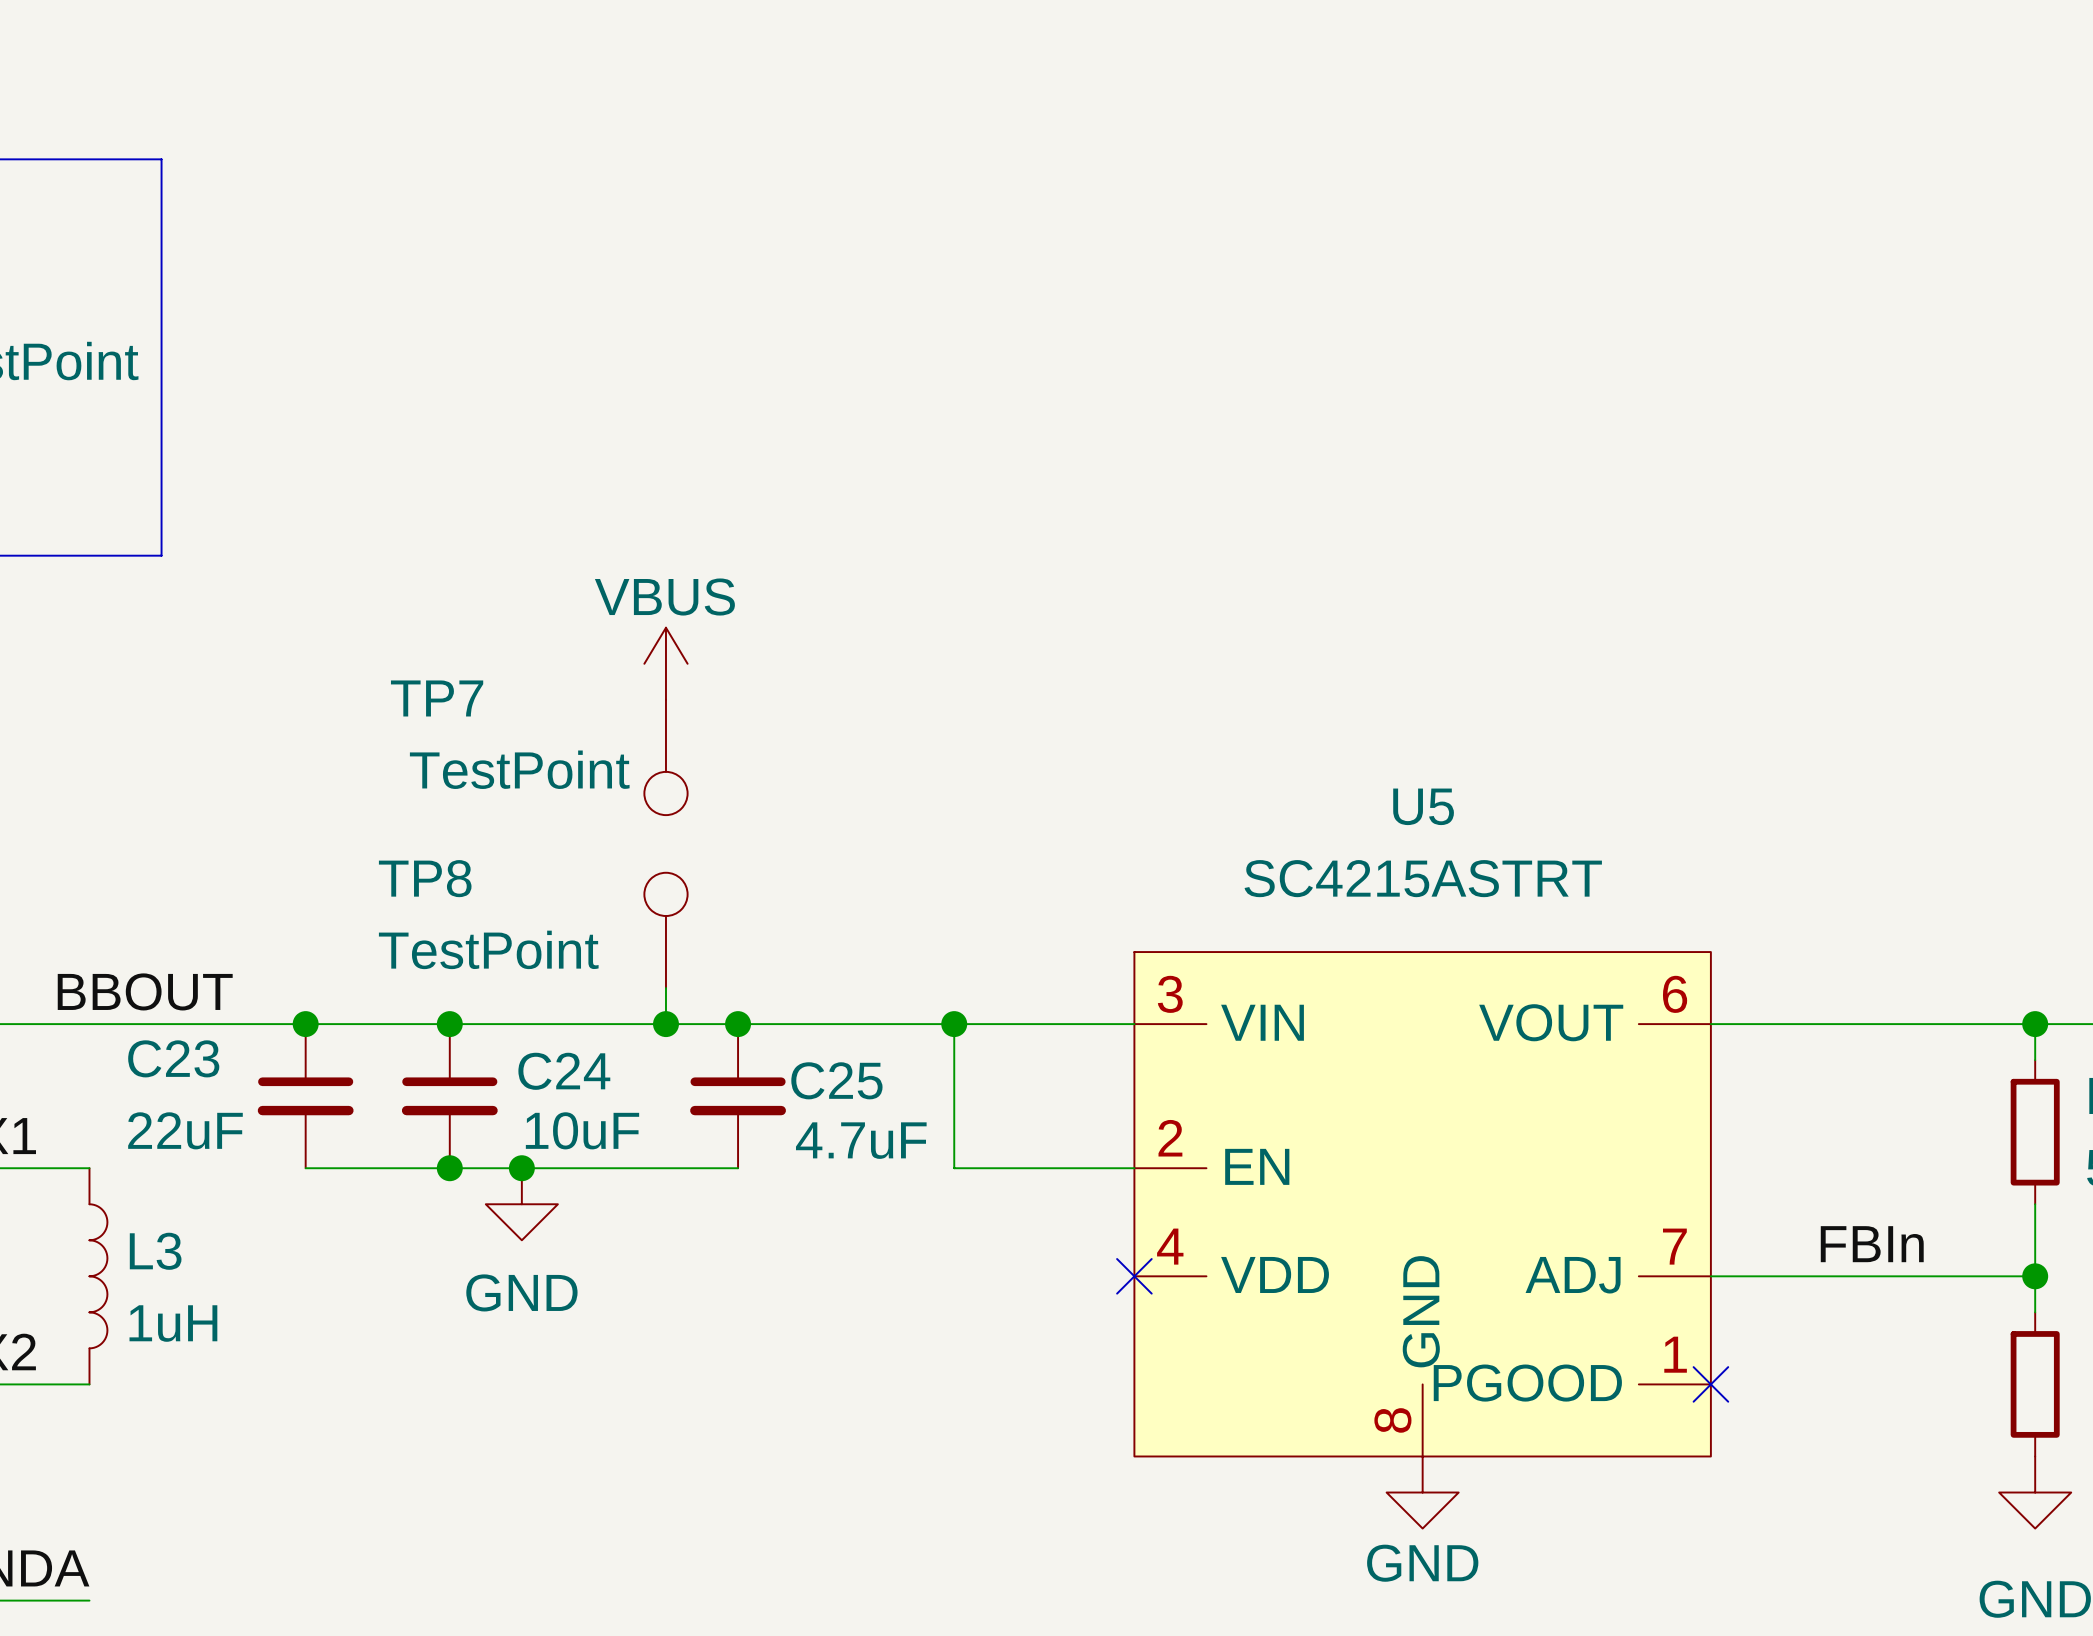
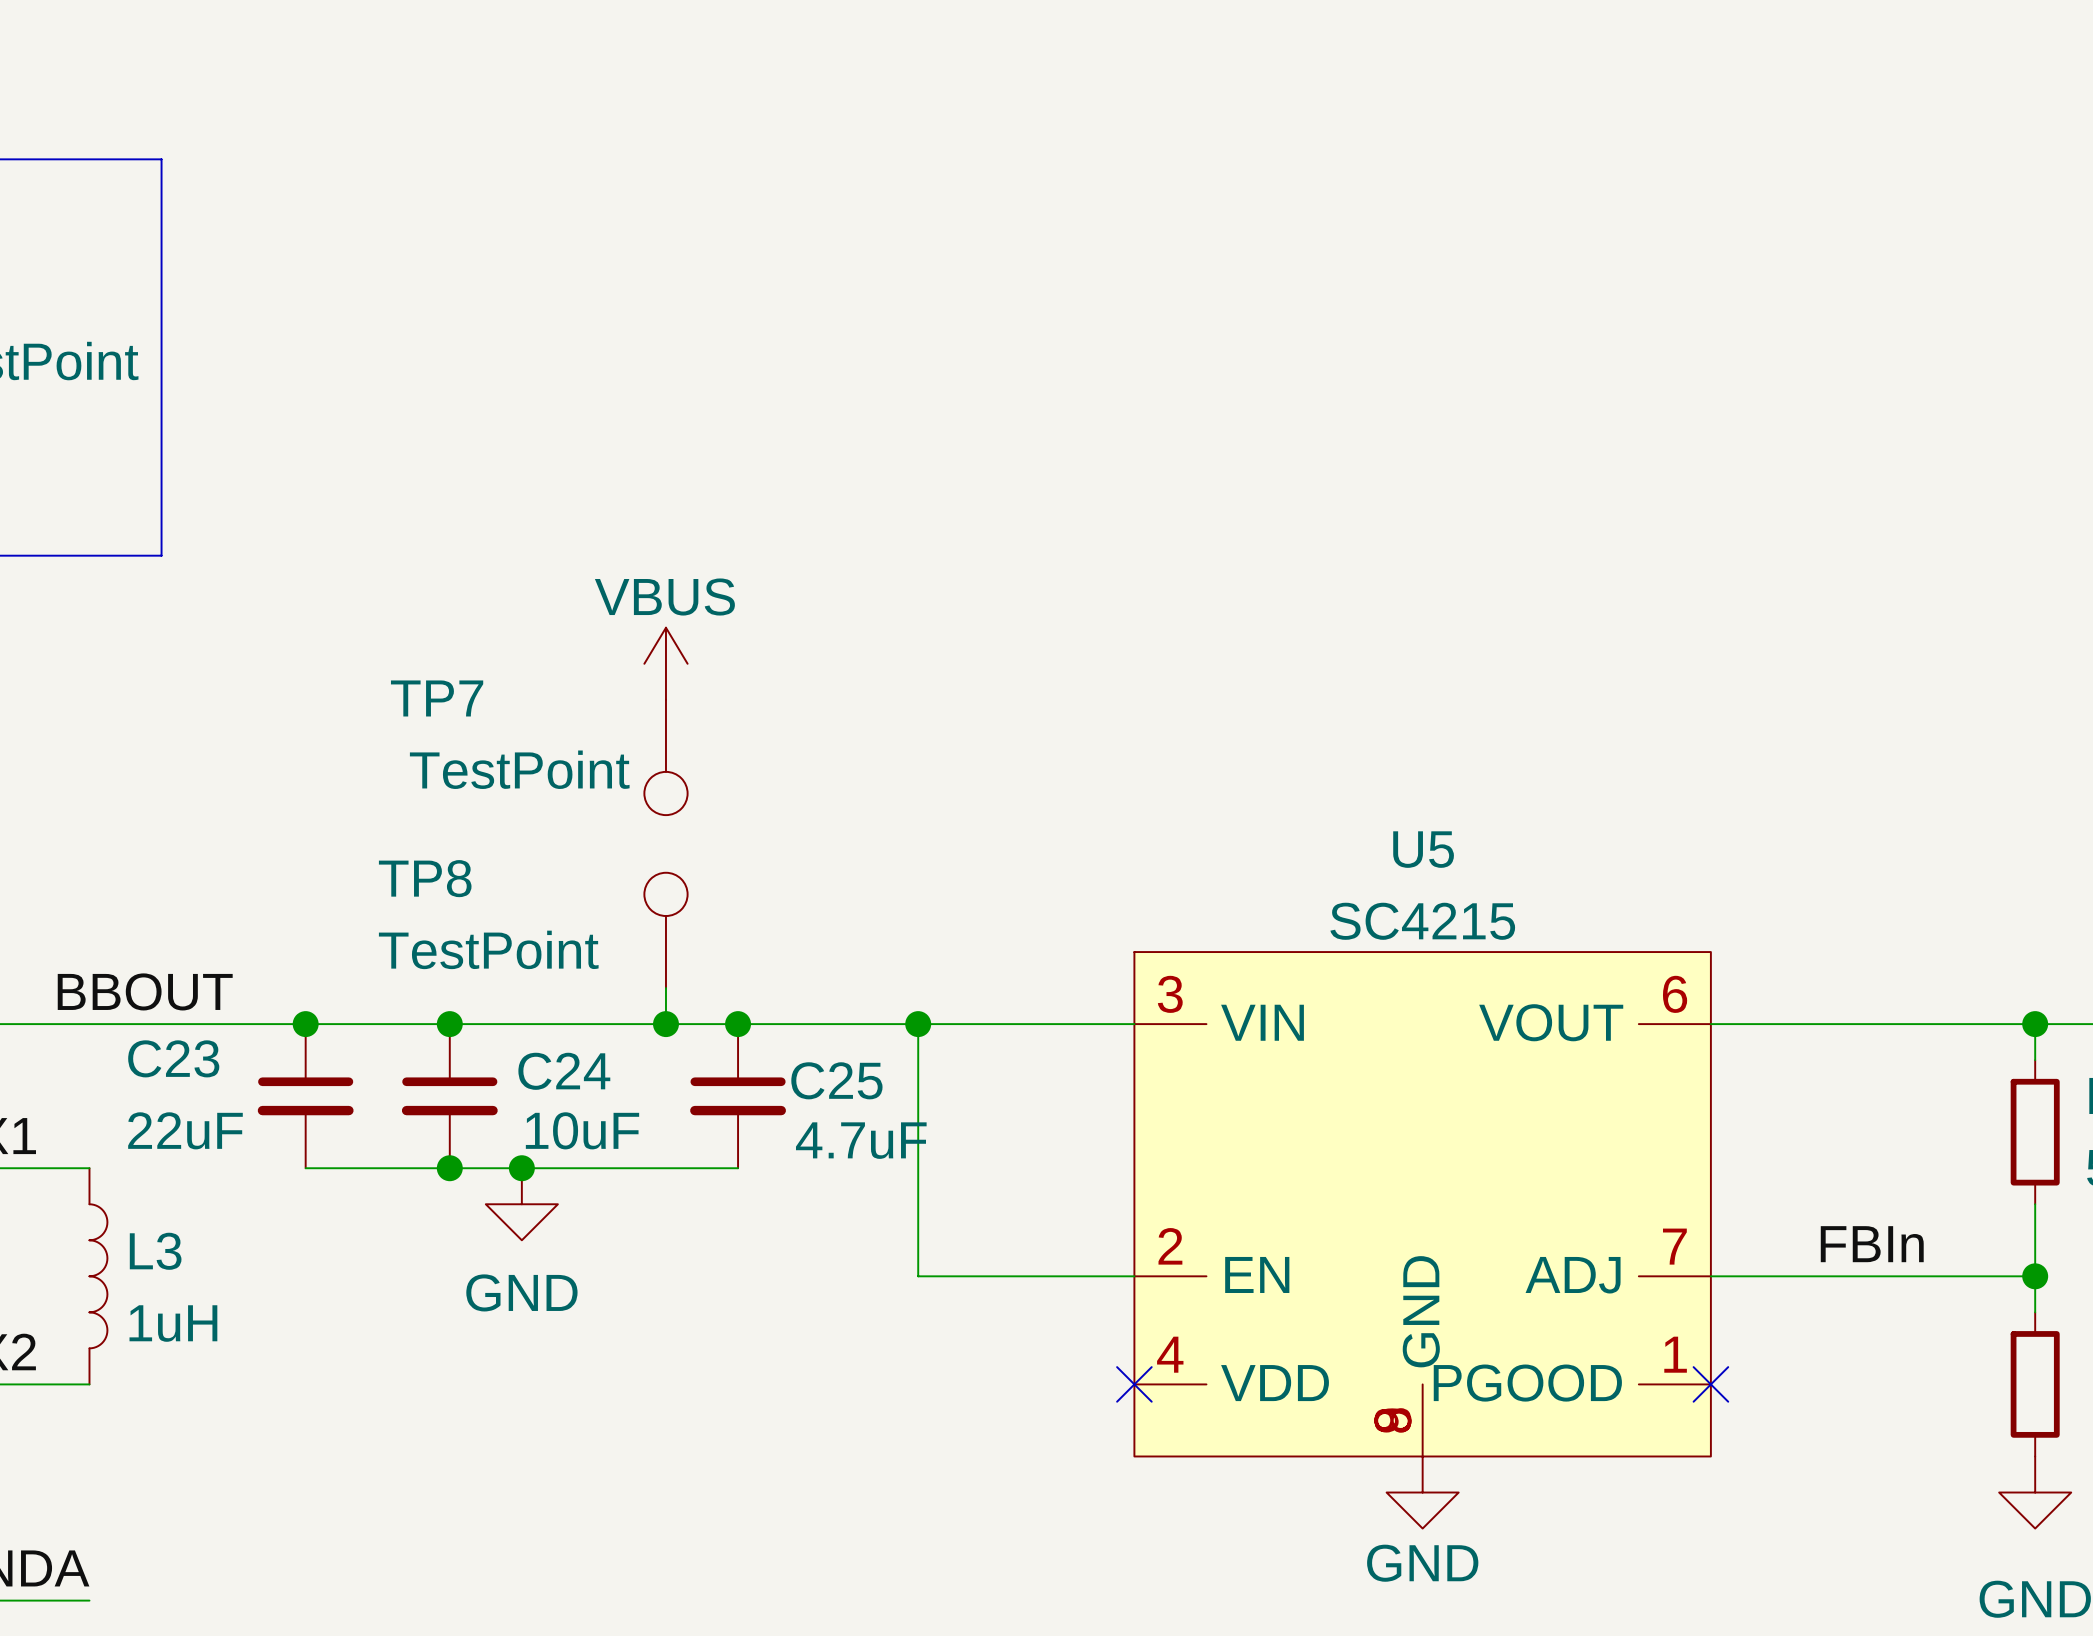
U5 value: SC4215ASTRT (1423, 878) -> SC4215 (1422, 921)
U5 symbol: [1134, 952, 1711, 1457] -> [1134, 952, 1711, 1457]
wire: none -> (918, 1024) (918, 1276) (1134, 1276)
wire: (954, 1024) (954, 1168) (1134, 1168) -> none
junction position: (954, 1024) -> (918, 1024)
no-connect mark position: (1134, 1276) -> (1134, 1384)

